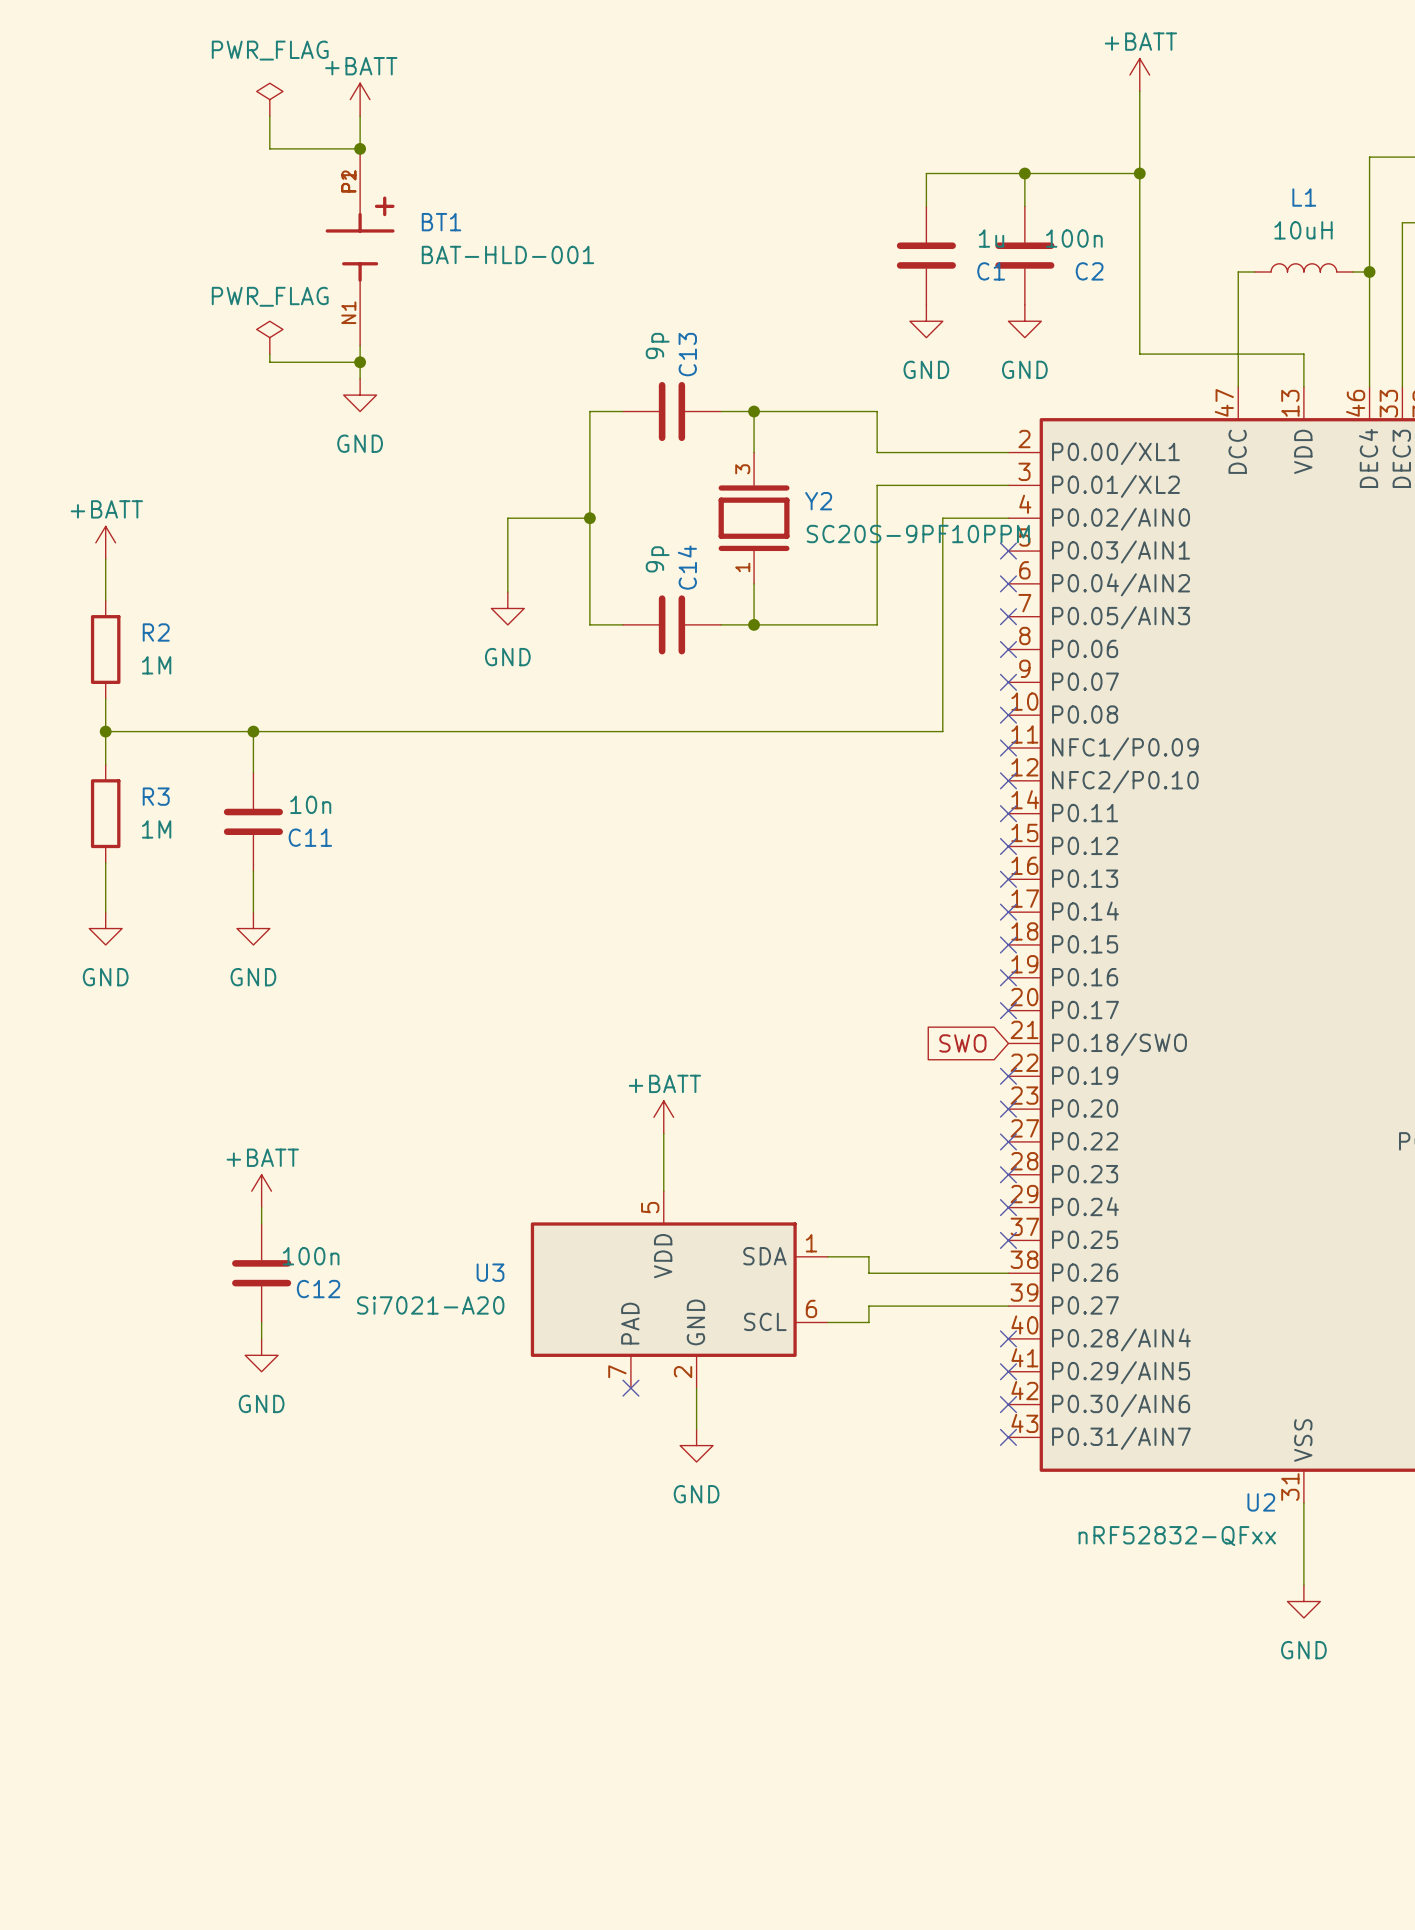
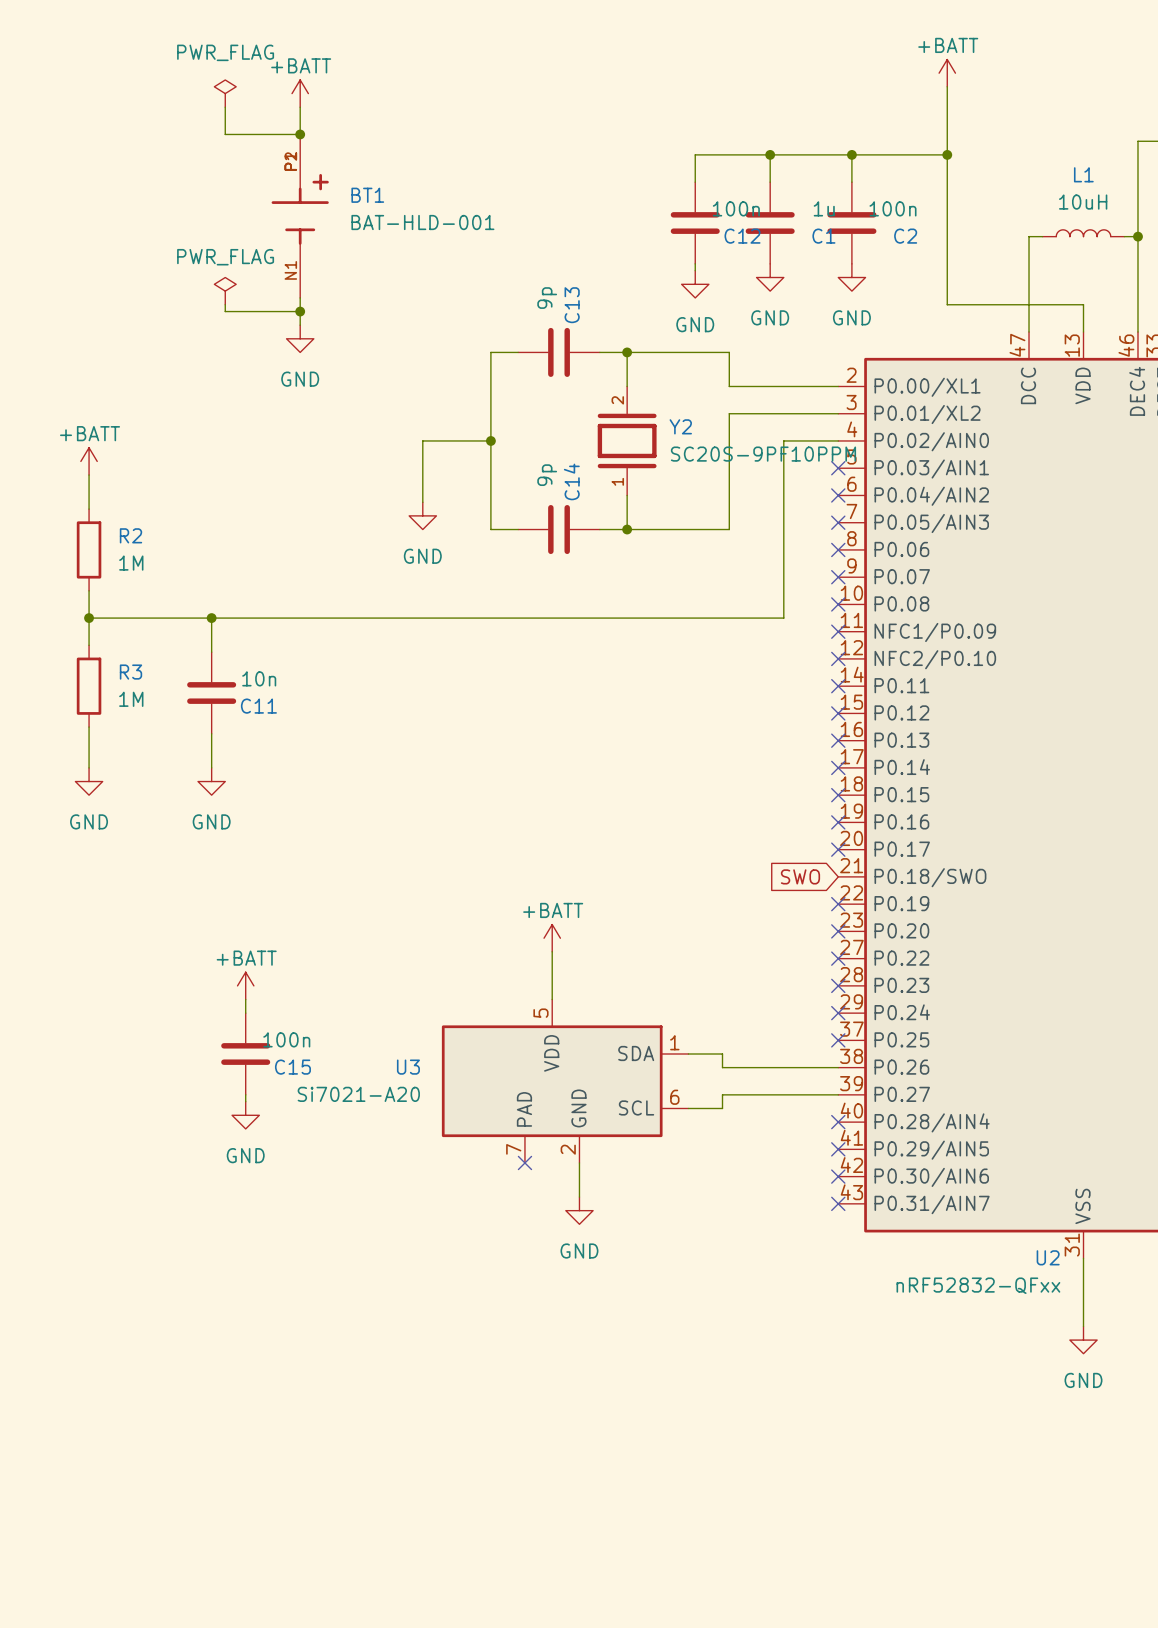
wire: none -> (770, 154) (695, 154) (695, 182)
junction: none -> (770, 154)
wire: none -> (695, 263) (695, 270)
power symbol: none -> GND (695, 284)
Y2 pin number: 3 (742, 469) -> 2 (617, 400)
power symbol position: +BATT (261, 1191) -> +BATT (245, 985)
wire: (261, 1207) (261, 1224) -> (245, 999) (245, 1013)
C15: none -> 100n (245, 1054)
C12 position: (261, 1273) -> (695, 223)
wire: none -> (245, 1094) (245, 1101)
wire: (261, 1322) (261, 1338) -> none
power symbol position: GND (261, 1355) -> GND (245, 1115)

